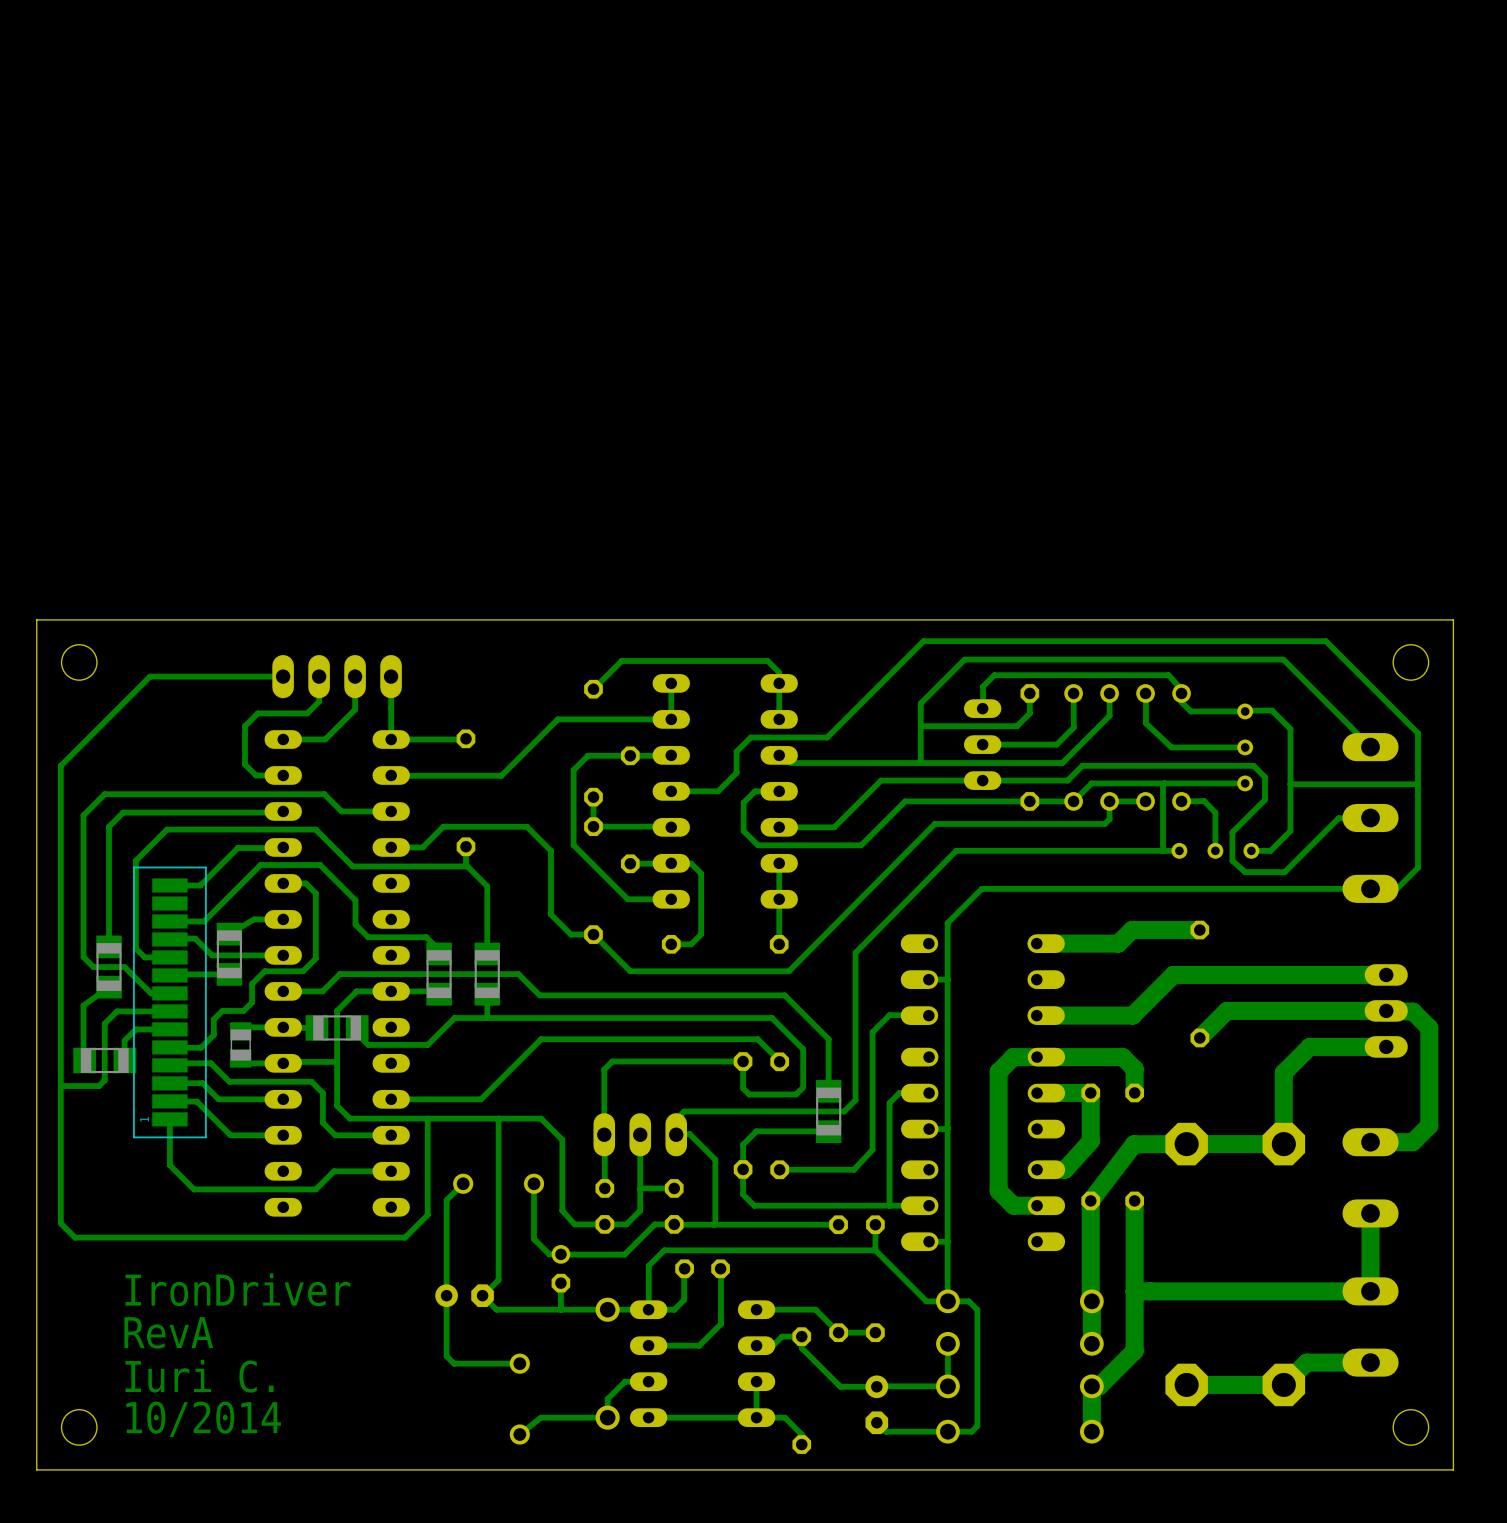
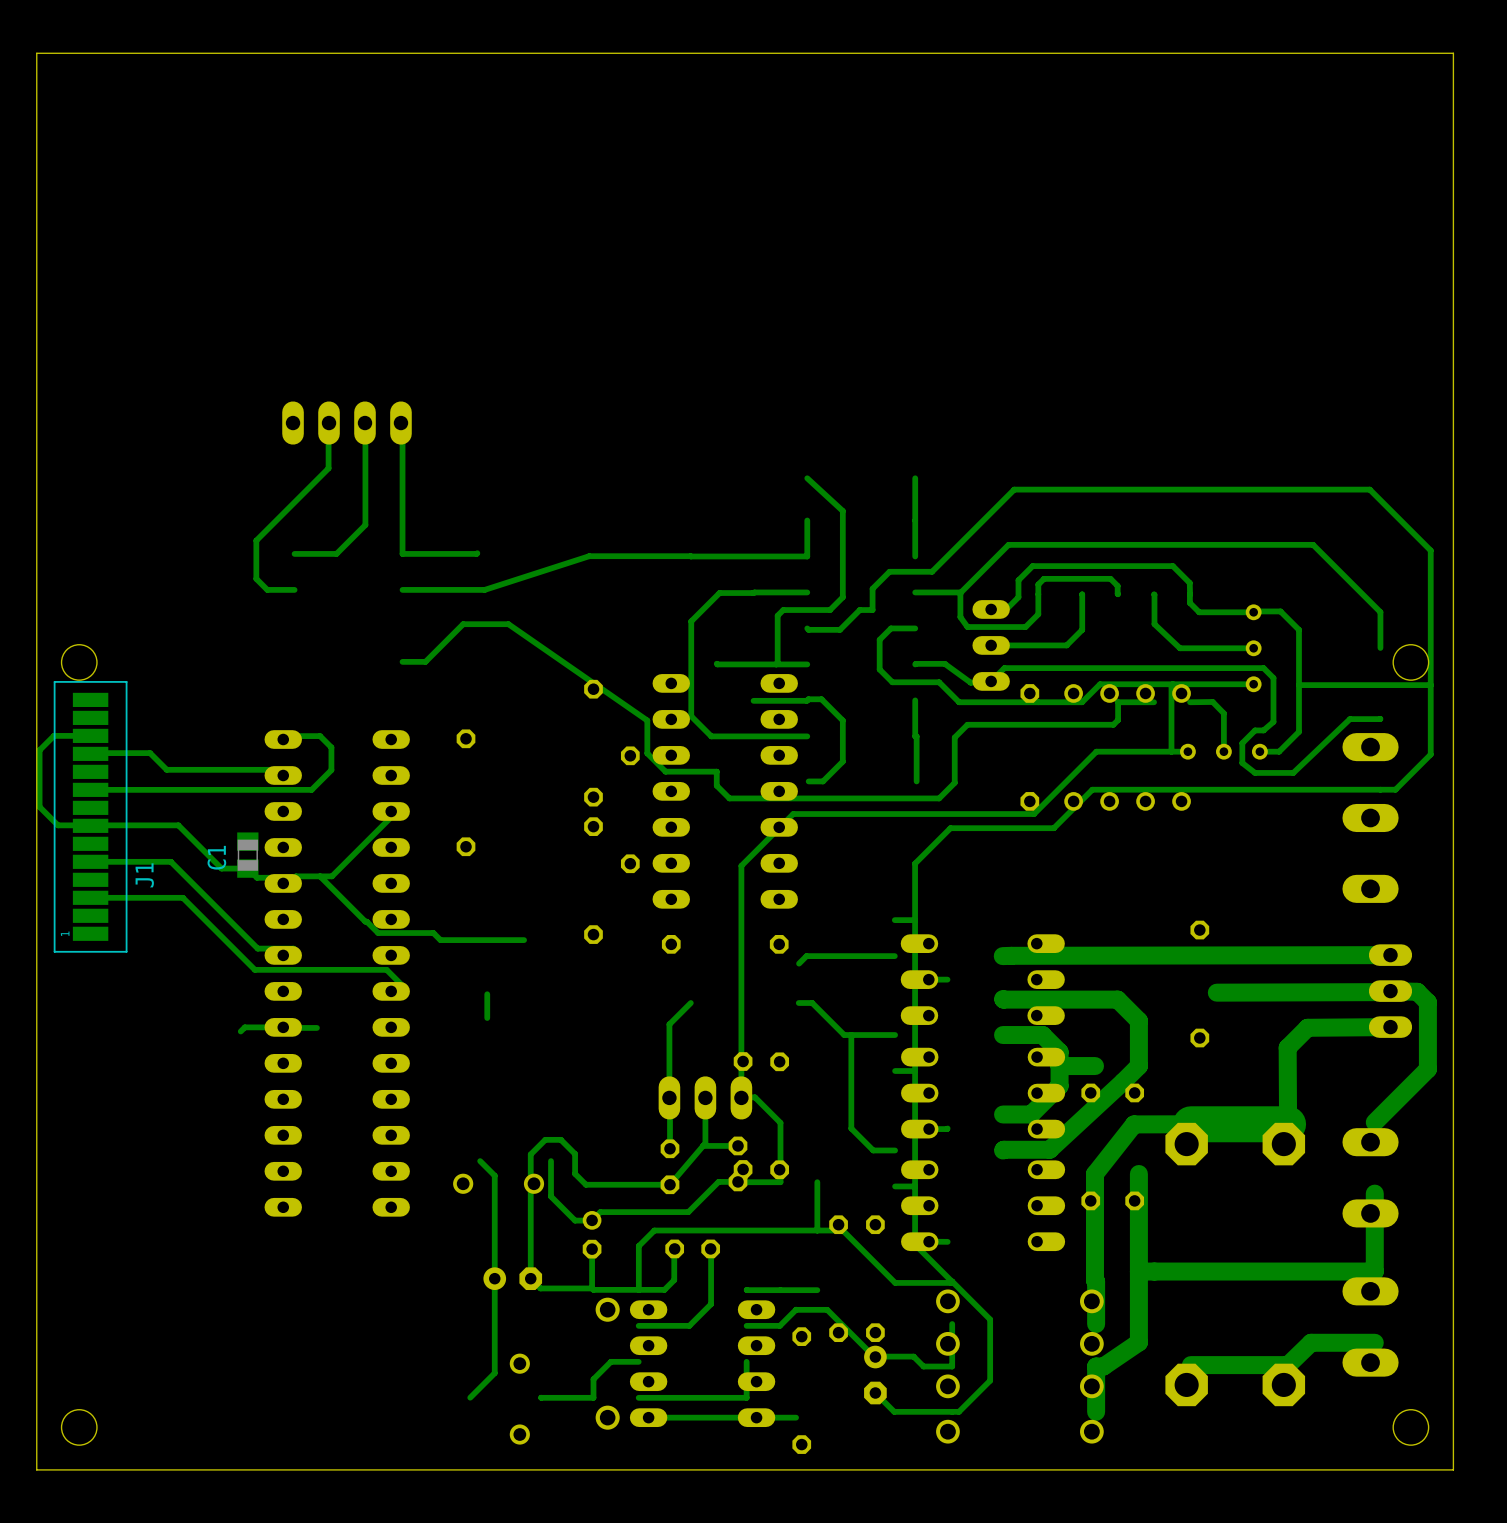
track: none -> (329, 423) (328, 468) (256, 540) (256, 578) (267, 589) (294, 589)
track: none -> (364, 423) (365, 525) (336, 553) (294, 553)
track: none -> (400, 423) (402, 424) (402, 553) (477, 553)
track: none -> (807, 478) (842, 511) (842, 597) (830, 610) (783, 610) (777, 615) (776, 664)
track: none -> (915, 478) (915, 556)
track: none -> (807, 520) (807, 556) (589, 556) (484, 589) (402, 589)
track: none -> (807, 592) (753, 592)
track: none -> (960, 592) (915, 592)
track: none -> (753, 593) (719, 593) (691, 621) (691, 716) (711, 736) (807, 736)
track: none -> (1082, 594) (1082, 629) (1066, 645) (991, 645)
track: none -> (1118, 594) (1117, 585) (1110, 578) (1043, 578) (1038, 584) (1038, 614) (1025, 627) (967, 627) (960, 617) (960, 593) (1008, 544) (1313, 544) (1380, 612) (1380, 647)
track: none -> (1190, 594) (1189, 582) (1172, 566) (1032, 566) (1018, 580) (1018, 597) (1006, 609) (976, 609)
board edge: (1453, 619) (36, 619) -> (1453, 619) (1453, 53) (36, 53) (36, 619)
track: none -> (807, 628) (840, 629) (859, 610) (872, 610) (872, 588) (889, 571) (932, 571) (1014, 489) (1369, 489) (1430, 550) (1430, 754) (1395, 789) (1092, 789) (1053, 828) (950, 828) (915, 863) (915, 1244) (951, 1281)
track: none -> (915, 628) (890, 628) (879, 639) (879, 669) (892, 682) (939, 682) (959, 702) (1082, 702) (1100, 684) (1253, 684)
part: none -> (1253, 648)
track: none -> (402, 661) (425, 661) (463, 624) (508, 624) (647, 720) (647, 753) (665, 771) (716, 771) (716, 785) (729, 798) (939, 798) (954, 782) (954, 737) (967, 724) (1113, 724) (1118, 720) (1118, 702) (1154, 702)
track: none -> (716, 663) (807, 664)
track: none -> (915, 664) (944, 663) (970, 682) (991, 681) (1004, 668) (1263, 668) (1273, 678) (1273, 721) (1263, 730) (1255, 730) (1242, 743) (1242, 763) (1255, 772) (1293, 772) (1349, 719) (1380, 718)
track: (283, 676) (150, 676) (60, 765) (60, 1223) (75, 1237) (405, 1237) (427, 1214) (427, 1118) -> none
track: (319, 676) (319, 701) (307, 713) (257, 713) (245, 726) (245, 764) (256, 775) (283, 775) -> none
part position: (337, 676) -> (347, 423)
track: (355, 676) (355, 709) (325, 739) (283, 739) -> none
track: (391, 676) (391, 739) (466, 738) -> none
track: (671, 683) (671, 719) (557, 719) (501, 775) (391, 775) -> none
track: none -> (1430, 685) (1298, 685)
track: (593, 689) (621, 661) (767, 661) (779, 672) (779, 719) -> none
track: (1029, 693) (1029, 713) (1017, 726) (920, 726) -> none
track: (1073, 693) (1073, 727) (1056, 744) (982, 744) -> none
track: (1109, 693) (1109, 715) (1062, 763) (791, 763) (779, 755) -> none
track: (1145, 693) (1145, 723) (1171, 747) (1245, 747) -> (1154, 594) (1154, 624) (1179, 648) (1253, 648)
track: (1181, 693) (1181, 702) (1190, 711) (1272, 710) (1290, 729) (1290, 831) (1270, 850) (1251, 850) -> (1189, 594) (1189, 602) (1199, 612) (1280, 611) (1298, 629) (1298, 731) (1279, 751) (1259, 751)
track: (1181, 693) (1181, 689) (1168, 675) (994, 675) (983, 686) (982, 708) -> none
track: none -> (753, 700) (821, 699) (842, 720) (842, 761) (823, 781) (808, 781)
track: none -> (915, 700) (916, 781)
track: none -> (294, 733) (296, 736) (320, 736) (331, 747) (331, 770) (311, 789) (90, 789)
track: none -> (90, 735) (53, 735) (39, 750) (39, 806) (58, 825) (178, 825) (221, 868) (247, 868) (257, 877) (331, 876) (402, 805)
part position: (982, 744) -> (991, 645)
part rotation: 0° (1245, 747) -> 90° clockwise (1223, 751)
track: (1370, 747) (1283, 659) (964, 659) (920, 703) (920, 763) -> none
track: none -> (1187, 751) (1096, 751) (1034, 814) (793, 814) (741, 865) (741, 1097) (755, 1097) (780, 1122) (780, 1182) (718, 1181) (688, 1212) (600, 1212) (591, 1220) (575, 1220) (551, 1196) (551, 1161)
track: none -> (90, 753) (150, 753) (166, 769) (294, 769)
track: (671, 755) (587, 755) (573, 770) (573, 845) (627, 899) (671, 899) -> none
track: (1164, 783) (1162, 850) -> (1172, 684) (1171, 751)
track: (1245, 783) (1091, 783) (1073, 801) (905, 801) (861, 845) (757, 845) (743, 831) (743, 802) (755, 791) (779, 791) -> none
track: (1417, 784) (1290, 784) -> none
track: (671, 791) (718, 791) (736, 772) (736, 751) (750, 737) (827, 737) (923, 641) (1325, 641) (1417, 733) (1417, 867) (1396, 888) (981, 888) (947, 923) (947, 1301) -> none
track: (593, 797) (593, 826) (671, 827) -> none
track: (1145, 801) (1109, 801) (1109, 819) (1104, 823) (934, 823) (789, 971) (630, 971) (593, 934) (570, 934) (551, 914) (551, 850) (526, 826) (443, 826) (422, 847) (391, 847) -> none
track: (1181, 801) (1204, 801) (1215, 812) (1215, 850) -> (1190, 702) (1212, 701) (1223, 713) (1223, 751)
track: (283, 811) (123, 812) (109, 826) (109, 946) -> none
track: (391, 811) (341, 811) (324, 794) (104, 794) (83, 815) (83, 957) (93, 967) (124, 967) (151, 993) (169, 993) -> none
J1: none -> (90, 816)
track: (1370, 817) (1338, 818) (1284, 872) (1245, 872) (1232, 860) (1232, 832) (1264, 799) (1264, 777) (1253, 765) (1082, 765) (1067, 780) (881, 780) (834, 827) (779, 827) -> none
track: (466, 846) (466, 865) (487, 886) (487, 953) -> none
track: (283, 847) (237, 848) (200, 885) (169, 885) -> none
track: (1179, 850) (956, 850) (855, 952) (855, 1100) (844, 1111) (684, 1111) (677, 1118) (676, 1134) -> none
part: (1215, 850) -> none
C1: none -> (247, 855)
track: none -> (90, 861) (170, 861) (257, 948) (294, 949)
track: (630, 863) (691, 863) (701, 873) (701, 934) (691, 944) (671, 944) -> none
track: (779, 863) (779, 944) -> none
track: (467, 866) (352, 866) (315, 829) (167, 829) (135, 860) (135, 948) (144, 957) (169, 957) -> none
track: none -> (320, 876) (378, 933) (433, 933) (440, 940) (524, 940)
track: (283, 883) (305, 883) (315, 893) (315, 958) (303, 971) (264, 971) (252, 984) (252, 1002) (243, 1010) (222, 1010) (213, 1019) (213, 1035) (201, 1047) (169, 1047) -> none
track: none -> (90, 897) (182, 897) (254, 969) (386, 969) (402, 985)
track: (283, 919) (254, 919) (229, 934) -> none
track: none -> (914, 920) (894, 920)
track: (170, 921) (204, 921) (260, 865) (320, 865) (355, 900) (355, 924) (368, 937) (426, 937) (438, 949) (439, 953) -> none
track: (1199, 930) (1131, 930) (1118, 943) (1036, 943) -> none
track: (169, 939) (195, 938) (212, 955) (283, 955) -> none
part: (229, 954) -> none
track: none -> (1390, 955) (1002, 956)
track: none -> (894, 956) (806, 956) (799, 963)
part: (109, 967) -> none
track: (229, 974) (169, 975) -> none
part: (439, 974) -> none
part: (487, 974) -> none
track: (1386, 974) (1173, 974) (1132, 1015) (1036, 1015) -> none
track: (109, 987) (83, 1005) (84, 1060) -> none
track: (283, 991) (322, 991) (339, 974) (518, 974) (539, 995) (784, 995) (828, 1039) (828, 1091) -> none
track: none -> (1216, 992) (1417, 991) (1427, 1002) (1427, 1069) (1374, 1122)
track: (439, 994) (437, 991) (356, 991) (337, 1010) (337, 1105) (349, 1118) (541, 1118) (562, 1139) (562, 1210) (574, 1224) (626, 1224) (640, 1210) (640, 1134) -> none
track: none -> (1003, 999) (1117, 999) (1138, 1020) (1138, 1066) (1123, 1081) (1049, 1149) (1003, 1150)
part: (169, 1002) -> none
track: none -> (690, 1003) (669, 1024) (670, 1148)
track: none -> (798, 1003) (812, 1003) (844, 1035) (895, 1035)
part position: (1386, 1010) -> (1390, 991)
track: (169, 1011) (117, 1011) (104, 1023) (104, 1080) (99, 1086) (60, 1086) -> none
track: (928, 1015) (889, 1015) (872, 1032) (872, 1149) (854, 1169) (780, 1170) -> none
part: (337, 1027) -> none
track: (357, 1027) (357, 1033) (368, 1044) (427, 1044) (454, 1018) (772, 1018) (803, 1049) (803, 1087) (796, 1094) (749, 1094) (743, 1088) (743, 1061) (612, 1061) (604, 1069) (604, 1188) -> none
track: none -> (1390, 1027) (1307, 1027) (1287, 1047) (1288, 1124) (1134, 1124) (1094, 1173) (1096, 1324)
track: (169, 1029) (135, 1029) (124, 1040) (124, 1060) -> none
track: none -> (851, 1035) (851, 1128) (873, 1150) (895, 1150)
track: none -> (1003, 1035) (1042, 1035) (1059, 1052) (1059, 1086) (1031, 1114) (1003, 1114)
track: (1199, 1037) (1226, 1010) (1413, 1011) (1429, 1027) (1429, 1125) (1412, 1142) (1370, 1142) -> none
part: (240, 1044) -> none
track: (1386, 1046) (1309, 1046) (1283, 1072) (1283, 1144) (1134, 1144) (1090, 1200) (1091, 1343) -> none
track: (240, 1058) (245, 1063) (337, 1061) -> none
part: (104, 1060) -> none
track: (779, 1061) (757, 1039) (541, 1039) (481, 1099) (391, 1099) -> none
track: (169, 1065) (171, 1063) (211, 1063) (229, 1081) (311, 1081) (322, 1093) (322, 1122) (335, 1135) (391, 1135) -> none
track: none -> (1094, 1066) (1059, 1066)
track: none -> (915, 1070) (895, 1071)
track: (169, 1083) (202, 1083) (218, 1099) (283, 1099) -> none
track: (1134, 1092) (1134, 1069) (1122, 1057) (1013, 1057) (998, 1071) (998, 1190) (1013, 1205) (1037, 1205) -> none
track: (929, 1093) (899, 1093) (889, 1103) (889, 1205) -> none
track: (1037, 1093) (1090, 1092) (1090, 1141) (1065, 1169) (1037, 1169) -> none
track: none -> (705, 1097) (705, 1143) (703, 1145)
track: (169, 1101) (196, 1101) (230, 1135) (283, 1135) -> none
part: (828, 1111) -> none
track: (170, 1118) (169, 1165) (194, 1189) (315, 1189) (333, 1171) (391, 1171) -> none
track: (498, 1118) (498, 1280) (482, 1295) (496, 1309) (674, 1309) (684, 1299) (684, 1268) -> none
track: (828, 1131) (756, 1131) (743, 1144) (743, 1194) (754, 1205) (929, 1205) -> none
part position: (640, 1134) -> (705, 1097)
track: (676, 1134) (689, 1134) (715, 1159) (713, 1224) -> none
track: none -> (703, 1145) (670, 1184) (585, 1184) (575, 1173) (575, 1154) (560, 1139) (545, 1139) (530, 1154) (530, 1278) (540, 1288) (592, 1288)
track: none -> (738, 1145) (703, 1145)
track: none -> (480, 1161) (494, 1175) (494, 1373) (470, 1397)
part: none -> (738, 1163)
part: none -> (670, 1166)
track: none -> (1138, 1173) (1138, 1342) (1103, 1366) (1096, 1366) (1096, 1411)
track: none -> (817, 1182) (817, 1230)
track: (463, 1183) (446, 1200) (446, 1356) (454, 1363) (519, 1363) -> none
track: (534, 1183) (534, 1239) (549, 1254) (624, 1254) (654, 1224) (838, 1224) -> none
track: none -> (914, 1186) (895, 1186)
track: (674, 1188) (640, 1189) -> none
track: (1134, 1200) (1134, 1350) (1099, 1386) (1091, 1386) (1091, 1431) -> none
part: (604, 1206) -> none
part: (674, 1206) -> none
track: (1370, 1213) (1370, 1291) (1134, 1291) -> (1374, 1193) (1374, 1271) (1138, 1271)
track: (875, 1224) (875, 1250) -> none
track: none -> (674, 1248) (674, 1280) (664, 1289) (592, 1288)
track: none -> (592, 1249) (592, 1288)
track: (875, 1250) (664, 1250) (648, 1265) (648, 1309) -> none
track: (875, 1250) (926, 1301) (968, 1301) (977, 1309) (977, 1426) (971, 1431) (885, 1431) (876, 1422) -> none
part position: (560, 1268) -> (592, 1234)
part position: (702, 1268) -> (692, 1248)
track: (720, 1268) (721, 1324) (699, 1345) (648, 1345) -> (710, 1248) (711, 1304) (689, 1325) (638, 1325)
track: (560, 1283) (560, 1309) -> none
text: IronDriver (237, 1289) -> none
track: none -> (638, 1289) (638, 1246) (654, 1230) (842, 1230) (895, 1282) (952, 1281) (990, 1319) (990, 1380) (958, 1411) (894, 1411) (875, 1393)
track: none -> (746, 1289) (817, 1290)
part position: (464, 1295) -> (512, 1278)
track: (756, 1309) (815, 1309) (838, 1332) (875, 1332) -> none
track: none -> (796, 1309) (779, 1325) (746, 1325)
track: none -> (796, 1309) (827, 1309) (874, 1357) (913, 1356) (923, 1366) (952, 1366) (952, 1324)
text: RevA (168, 1332) -> none
track: (947, 1343) (947, 1386) (840, 1386) (801, 1348) (801, 1336) (782, 1336) (772, 1346) (756, 1345) -> none
track: none -> (638, 1361) (610, 1361) (593, 1379) (593, 1397) (541, 1397)
track: none -> (746, 1361) (746, 1397) (638, 1397)
track: (1370, 1362) (1306, 1362) (1283, 1384) (1186, 1384) -> (1374, 1342) (1311, 1342) (1288, 1365) (1190, 1365)
text: Iuri C. (199, 1376) -> none
track: (648, 1381) (625, 1381) (607, 1399) (607, 1417) (540, 1417) (519, 1434) -> none
track: (756, 1381) (756, 1417) -> none
part position: (876, 1404) -> (875, 1375)
track: (784, 1417) (801, 1434) (801, 1444) -> (784, 1417) (796, 1417)
text: 10/2014 (203, 1419) -> none

